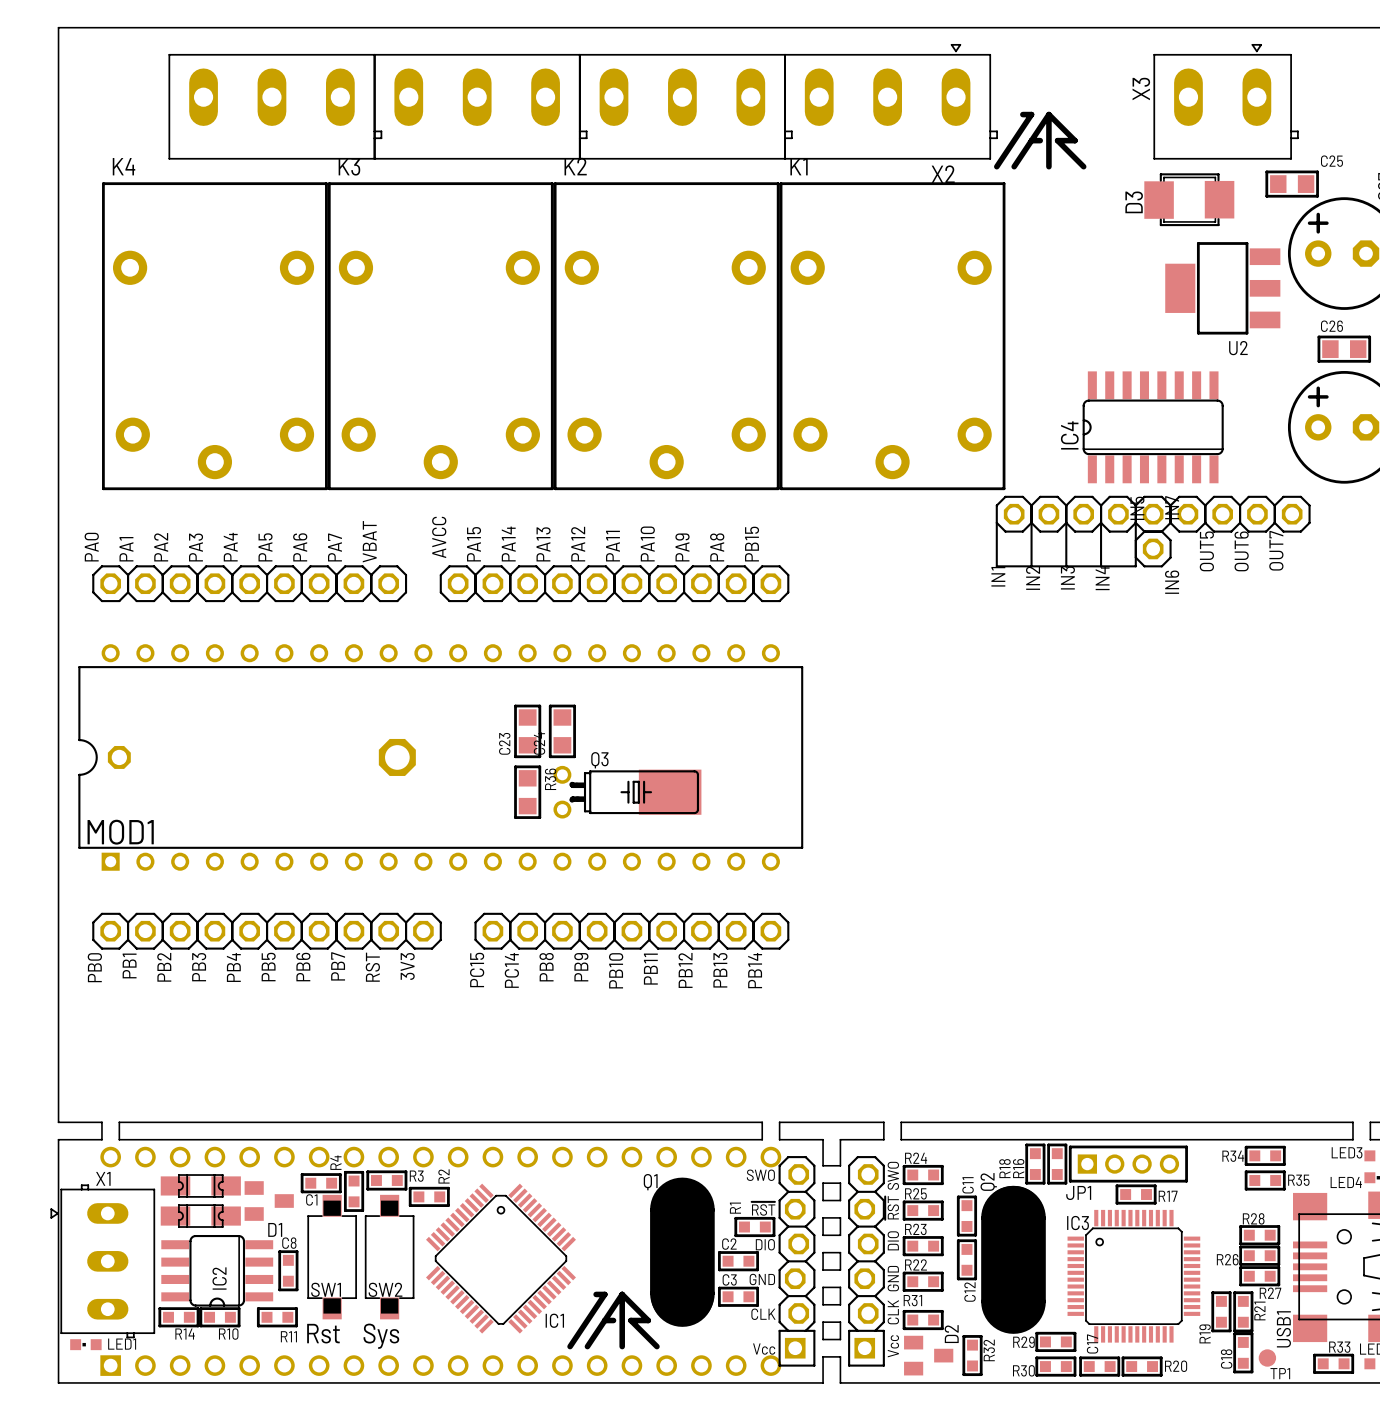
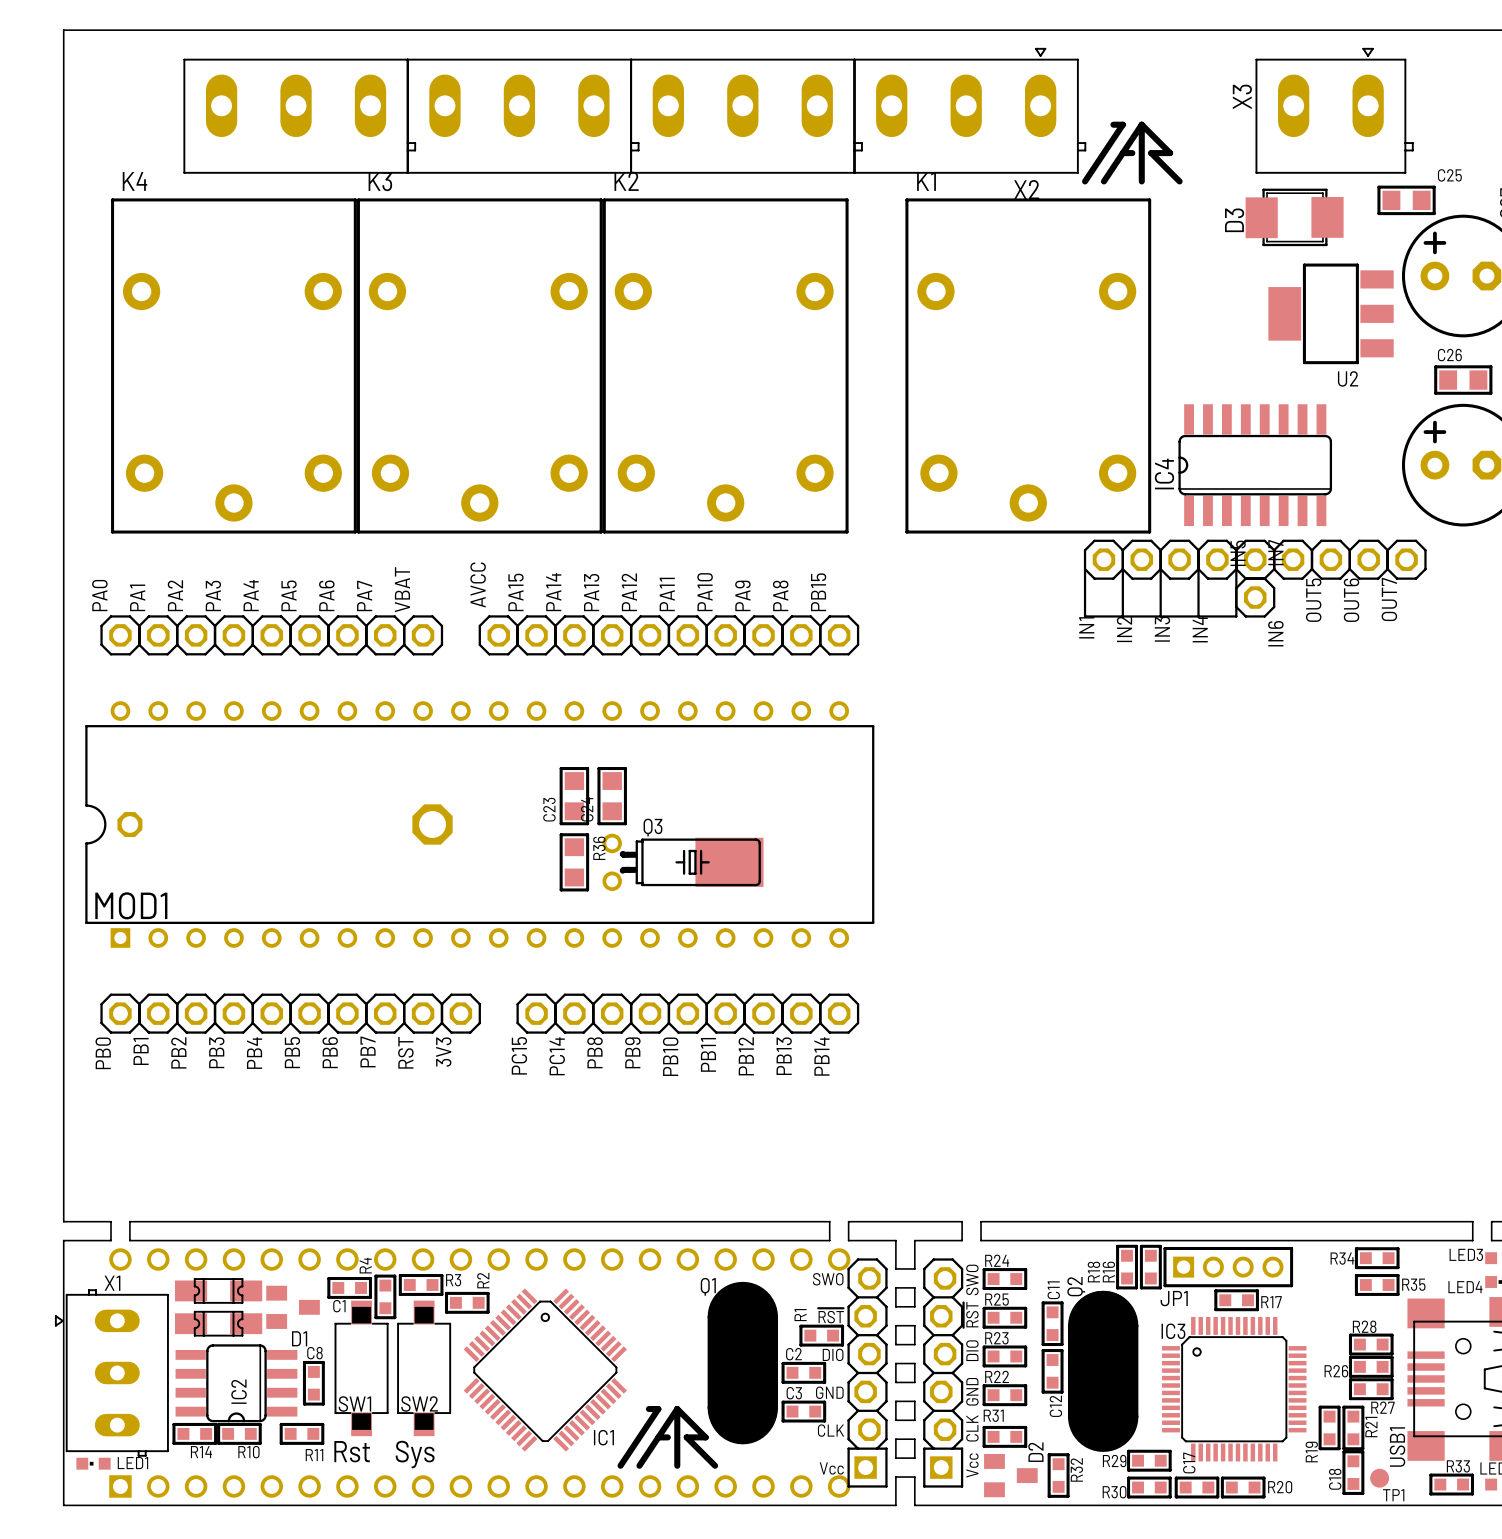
K1 position: (892, 336) -> (1028, 365)

